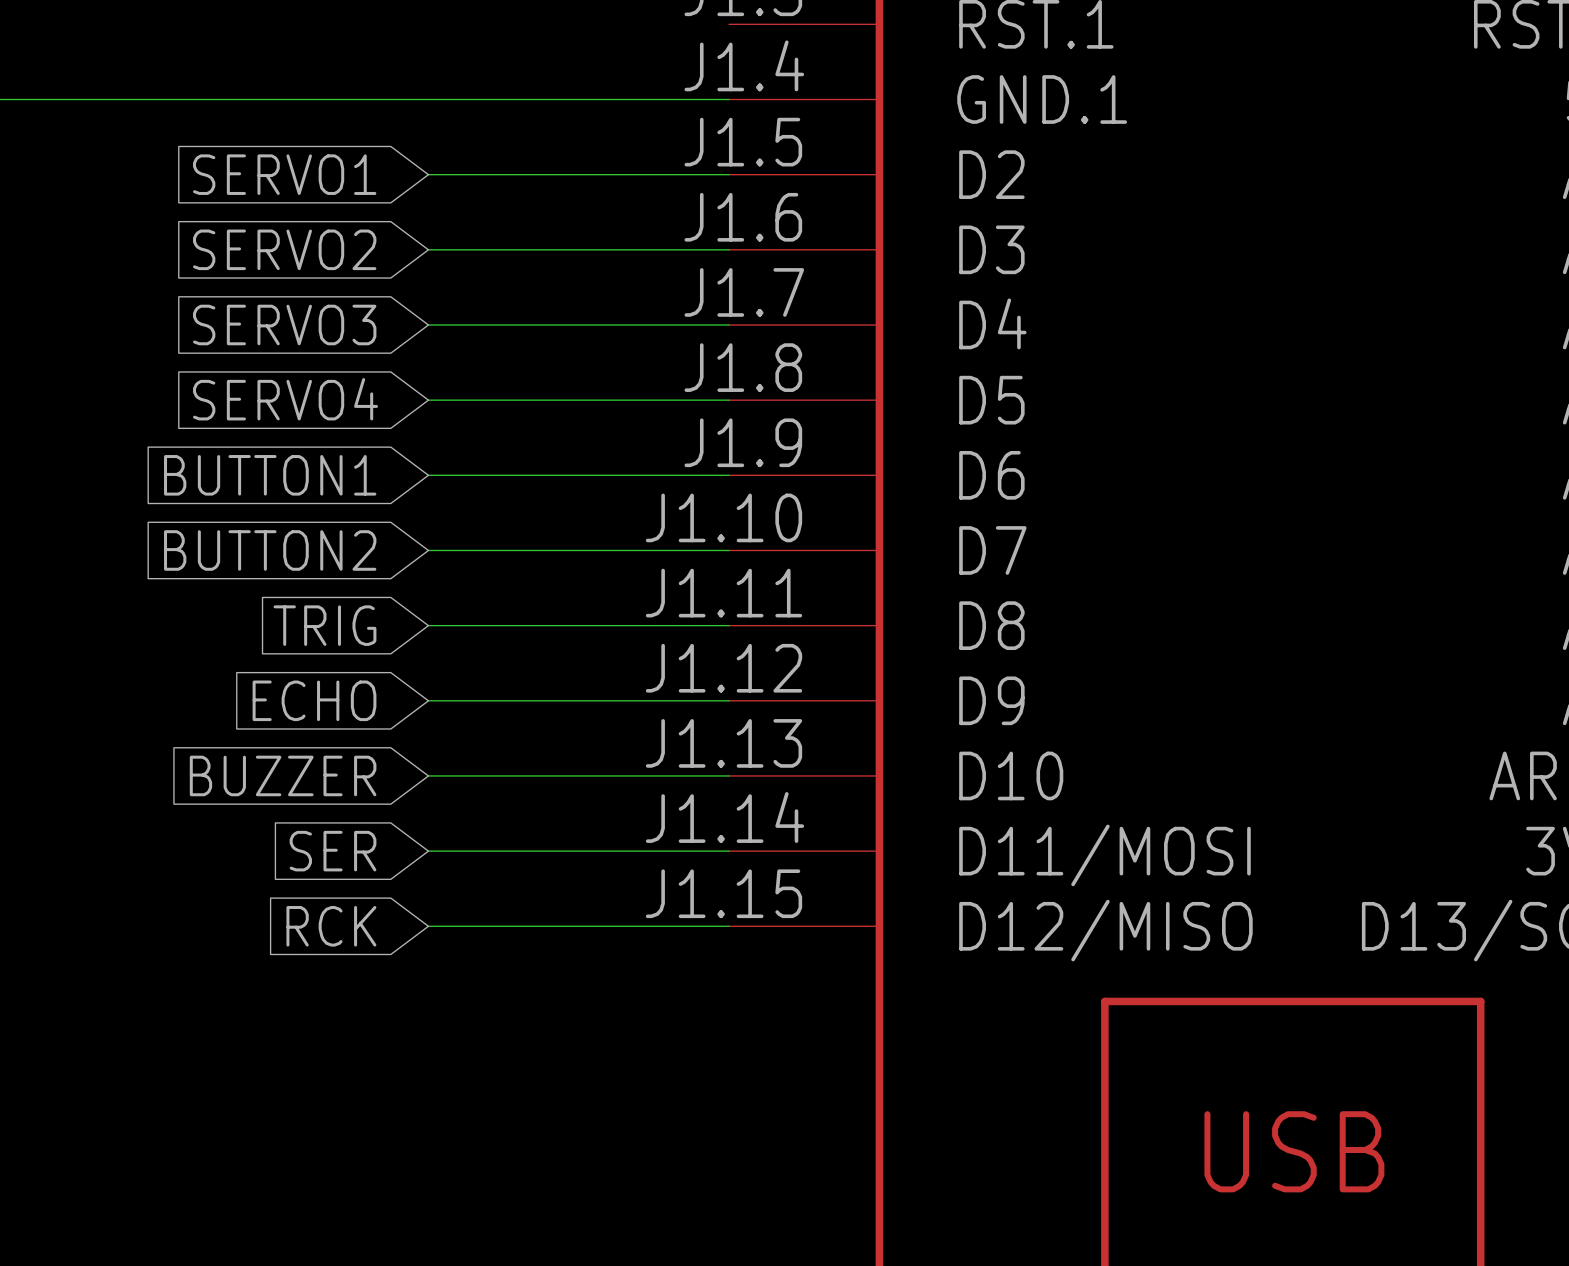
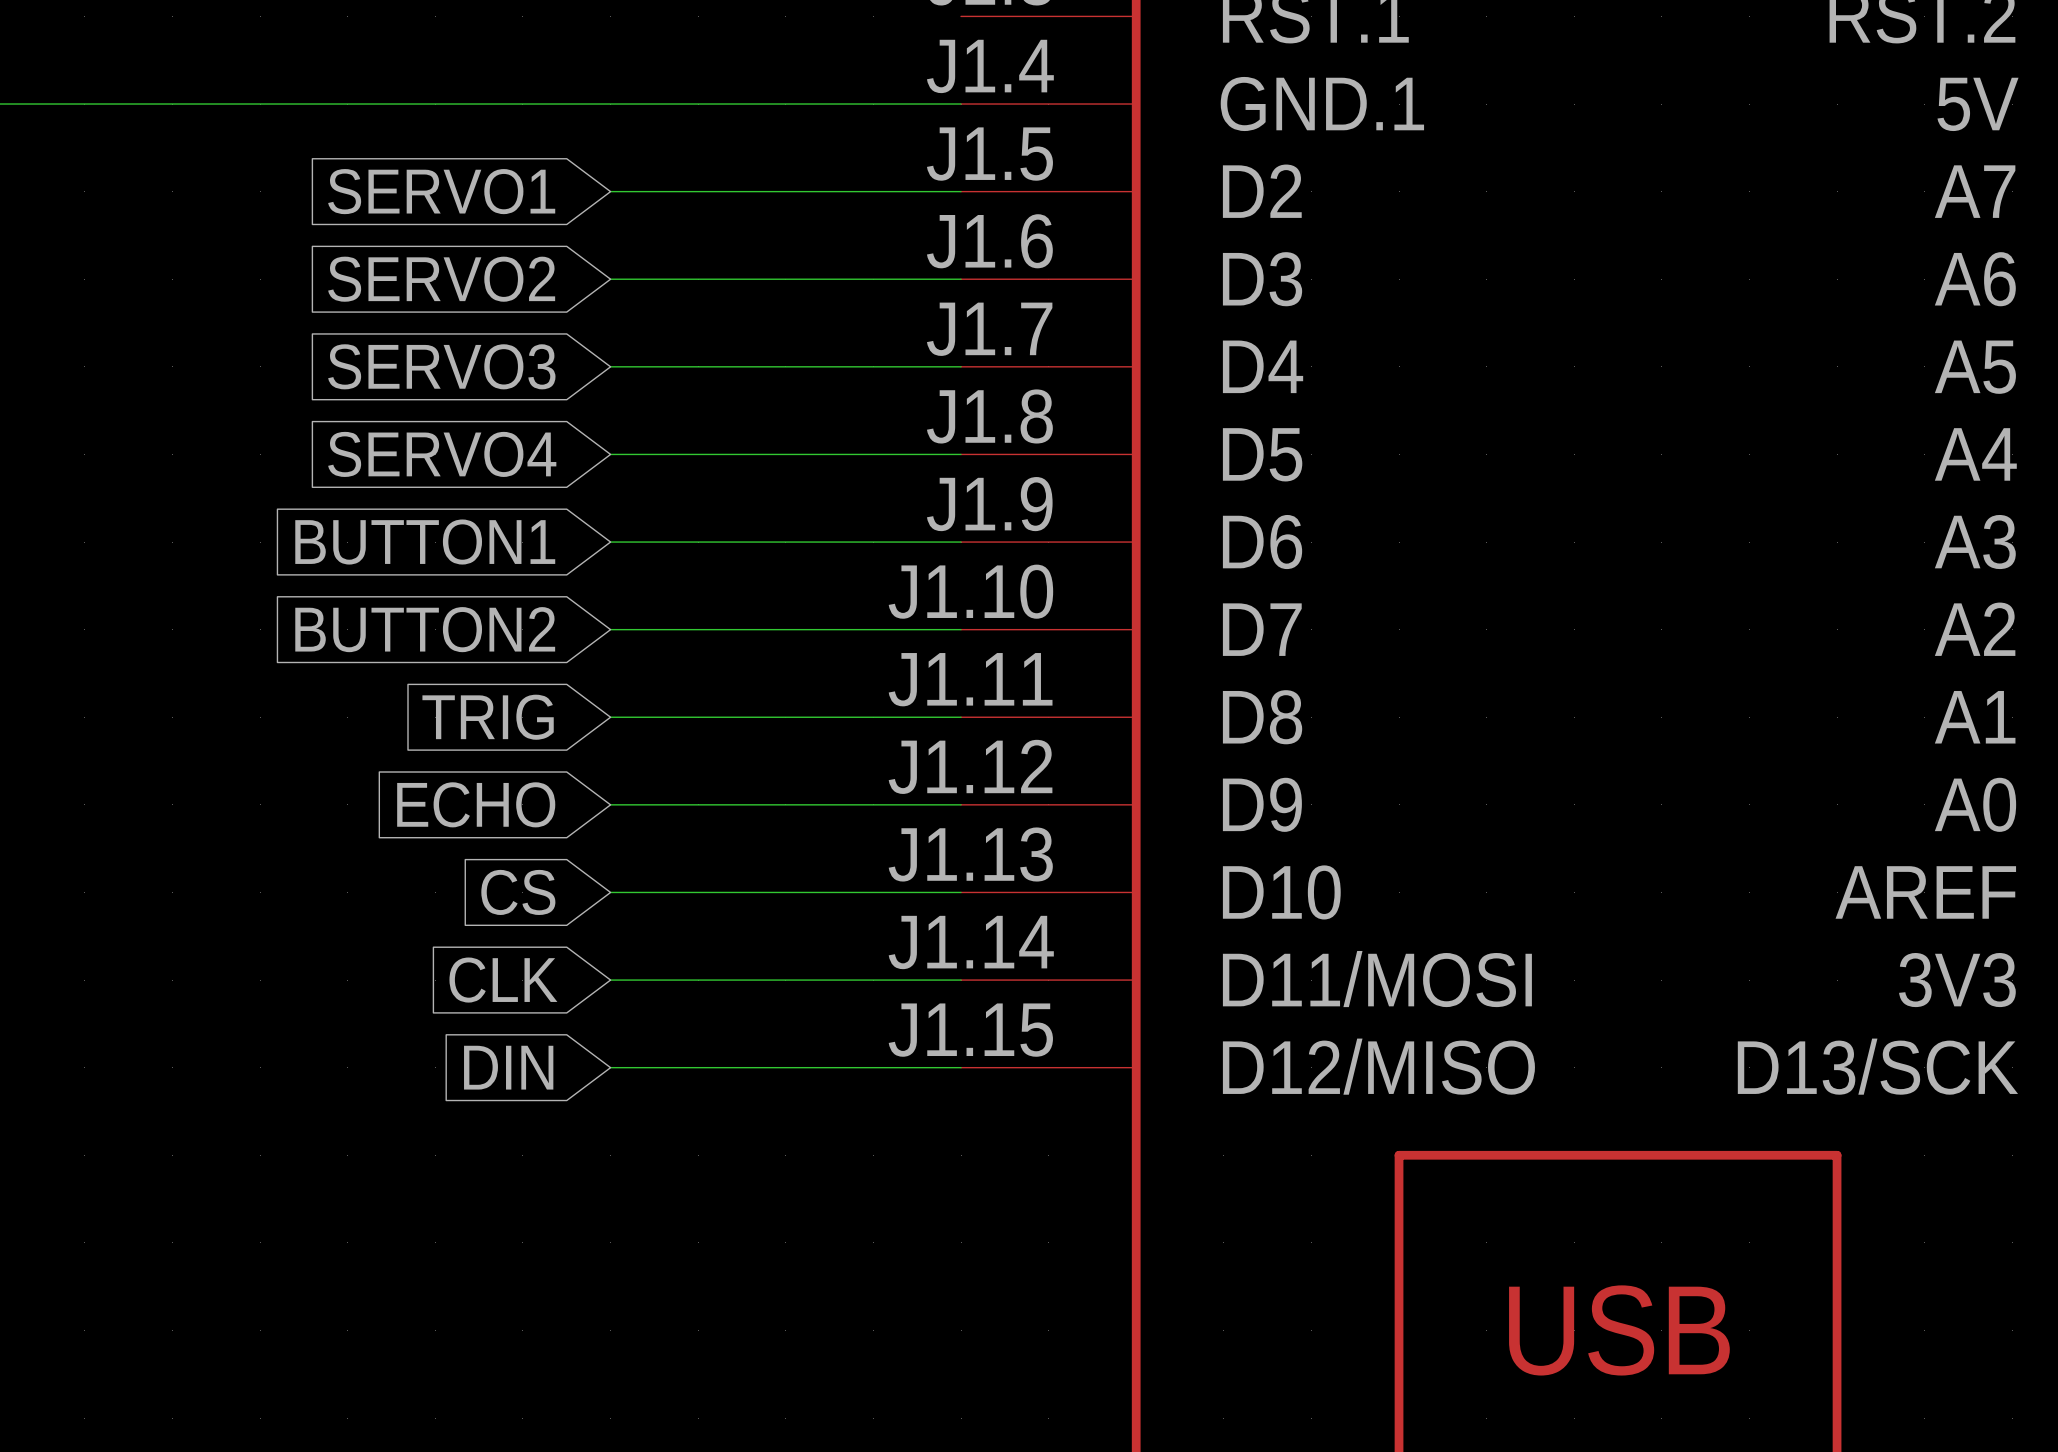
global label: BUZZER (283, 775) -> CS (518, 892)
global label: SER (333, 851) -> CLK (503, 980)
global label: RCK (331, 926) -> DIN (508, 1067)

